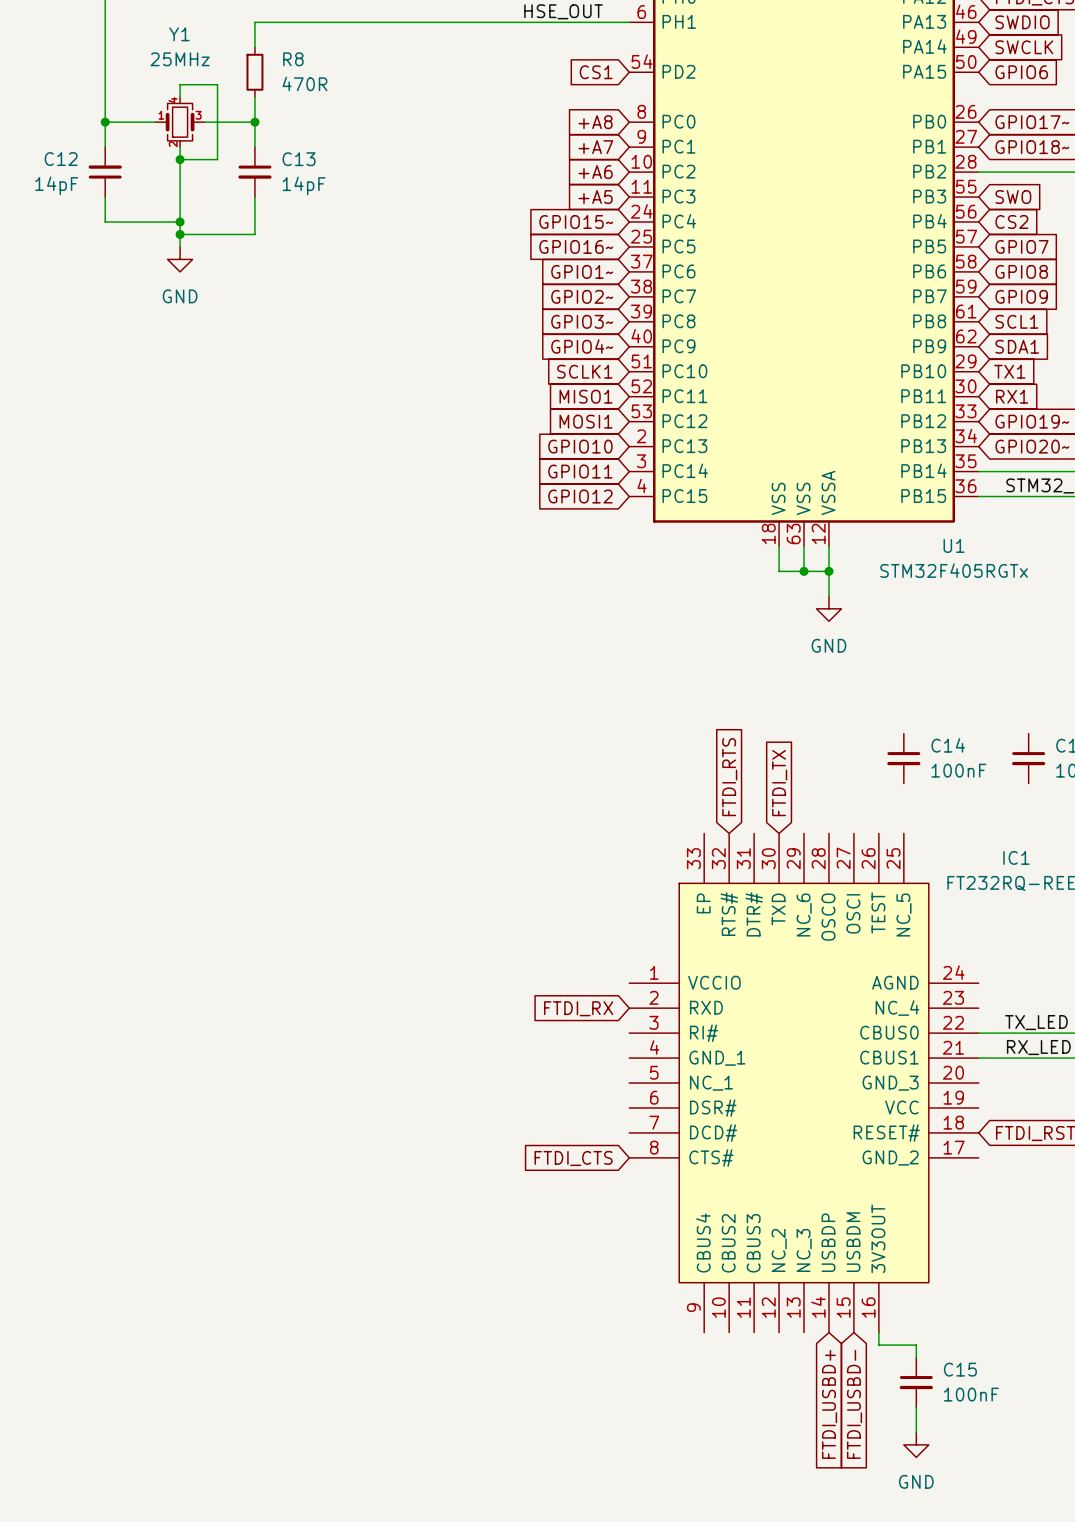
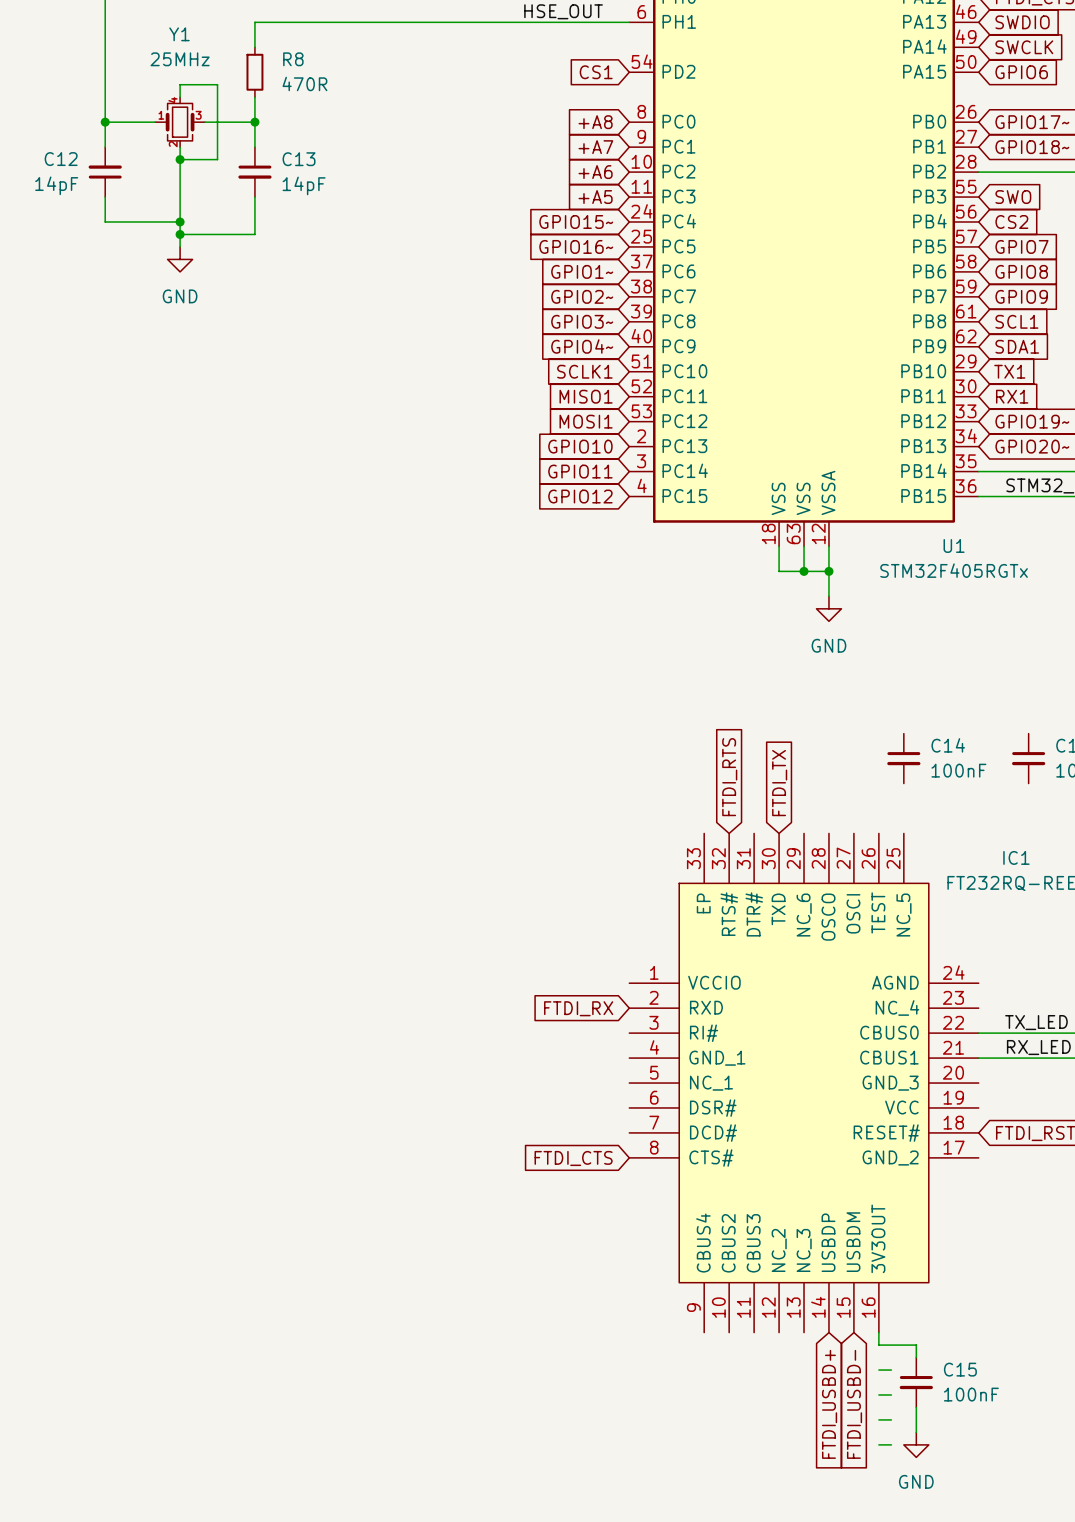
wire: none -> (878, 1370) (891, 1370)
wire: none -> (878, 1394) (891, 1394)
wire: none -> (878, 1419) (891, 1419)
wire: none -> (878, 1444) (891, 1444)

